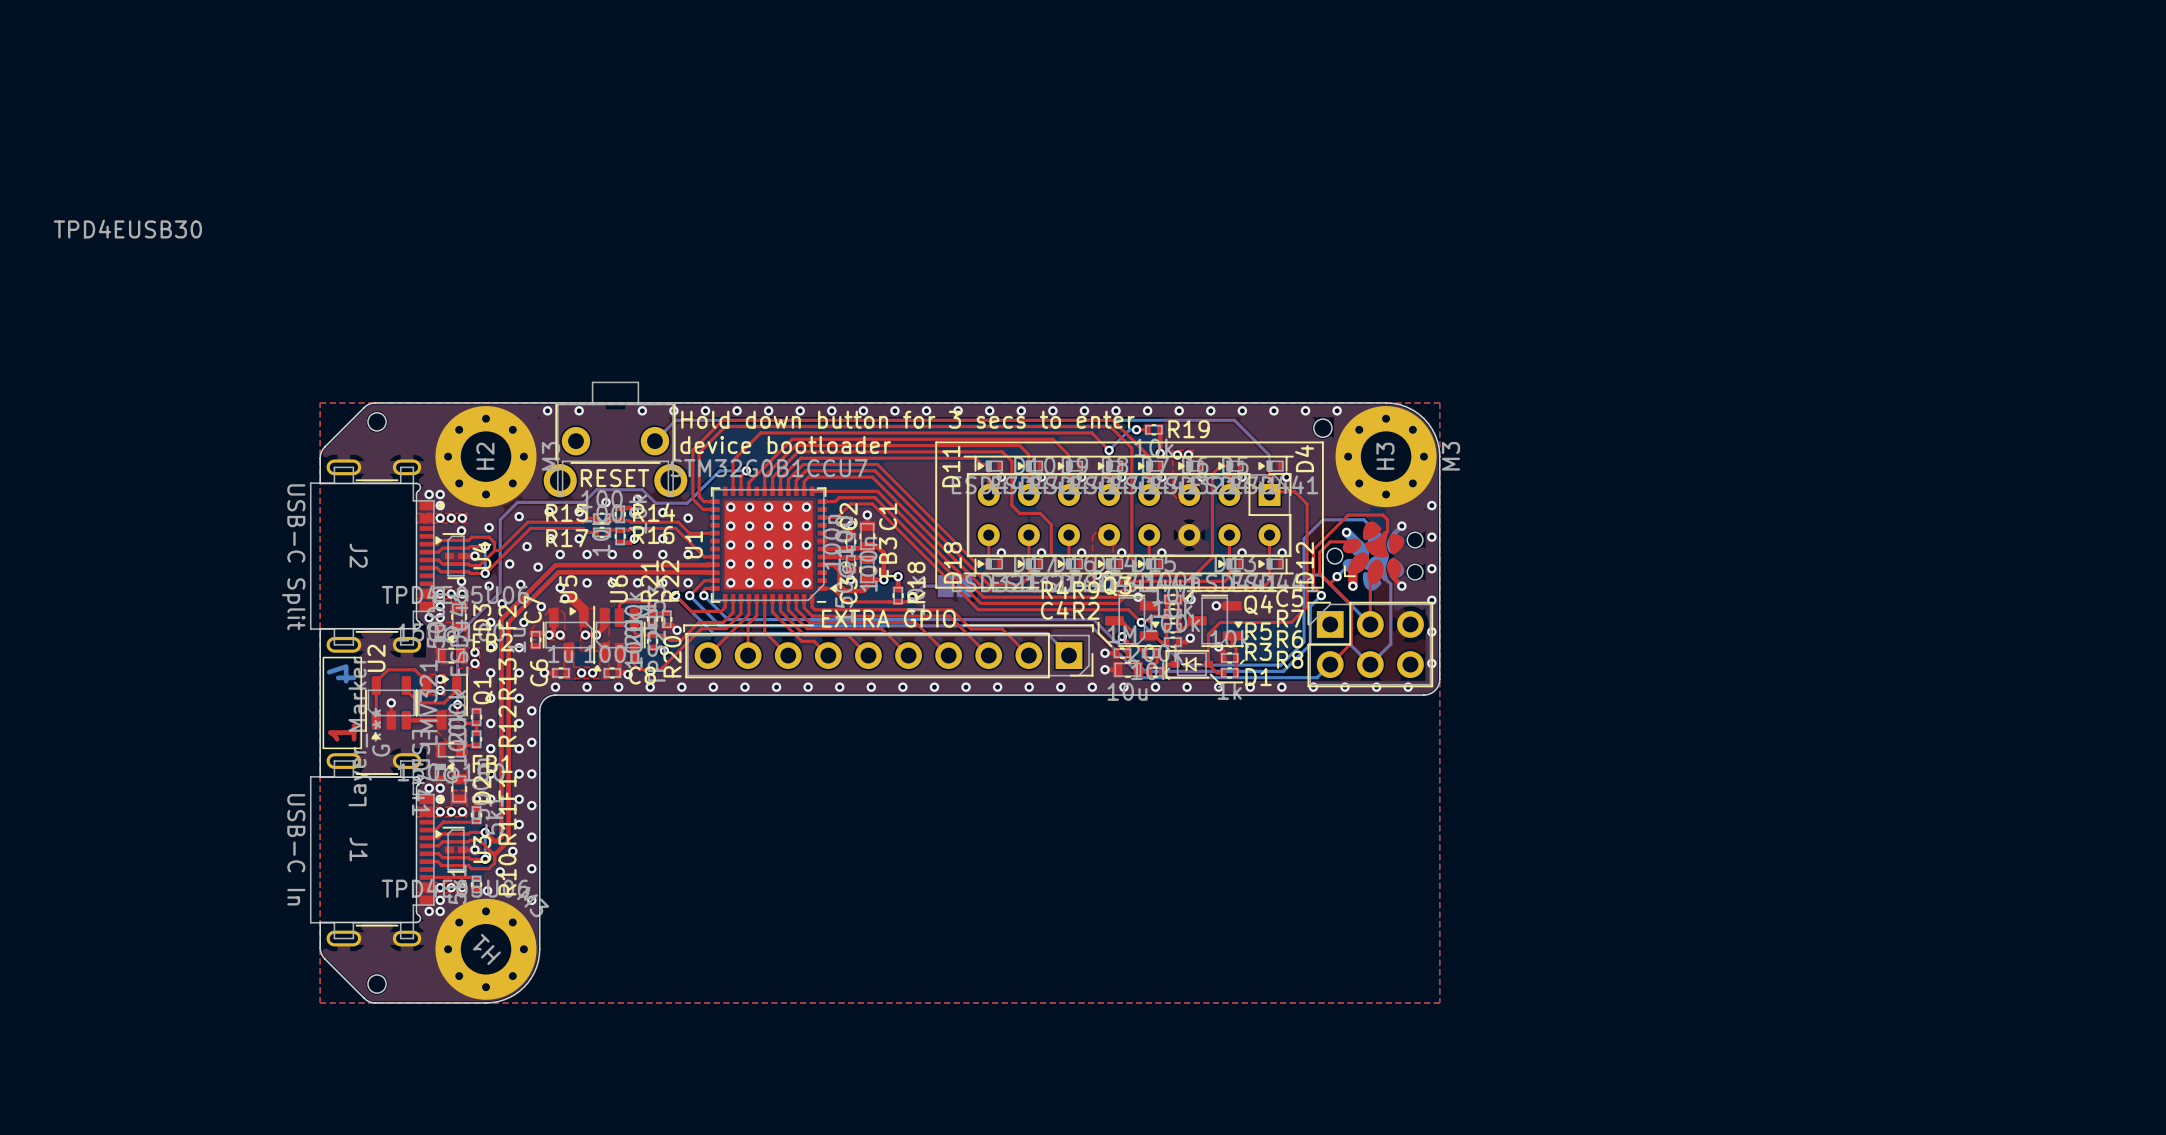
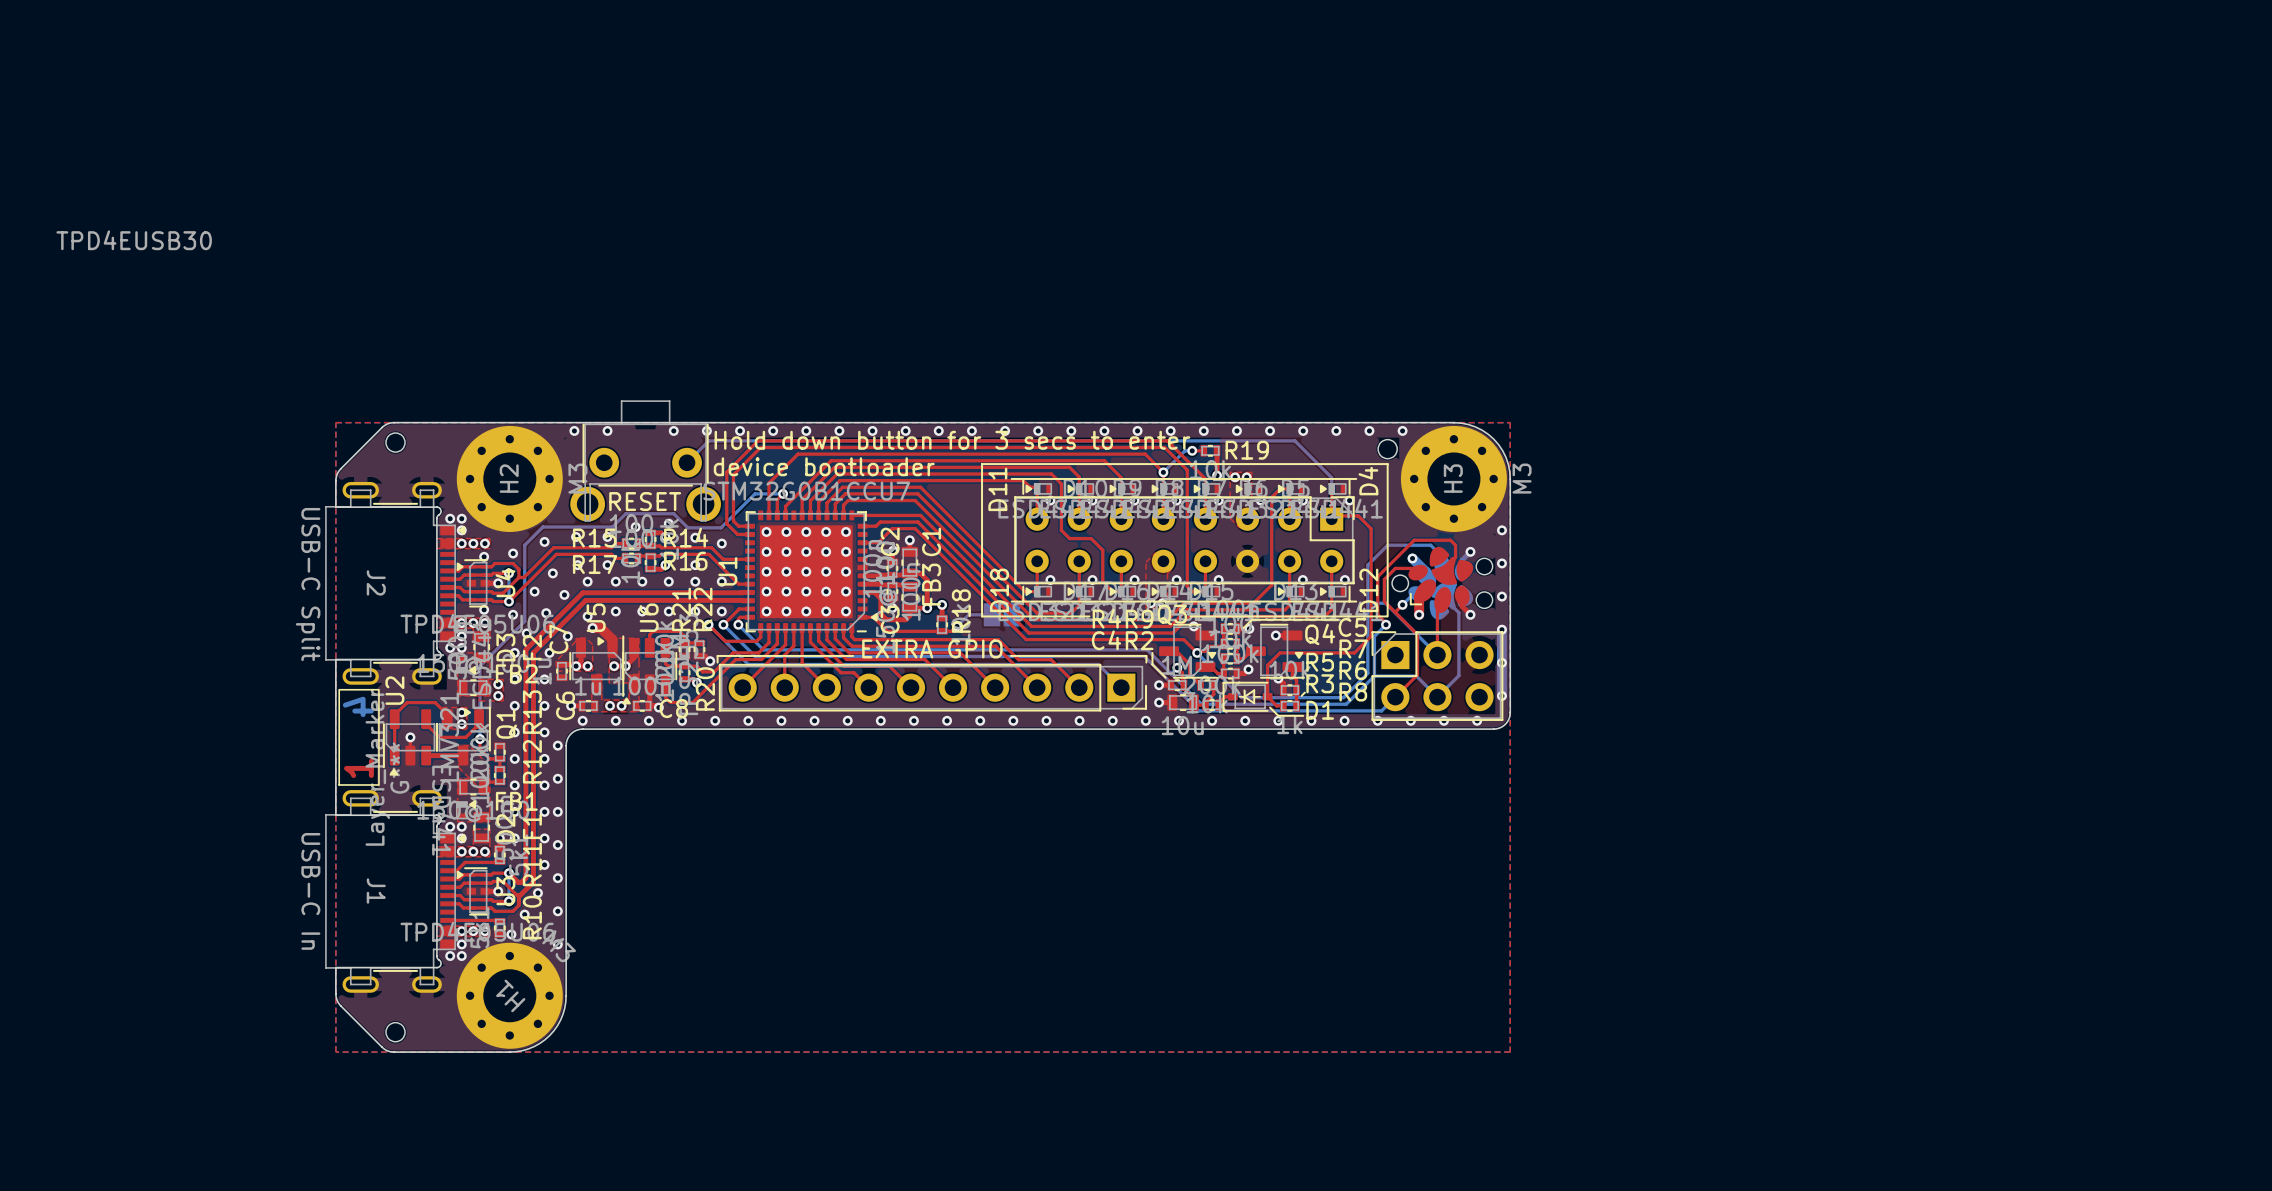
bottom track: none -> (1501, 629) (1501, 695)

